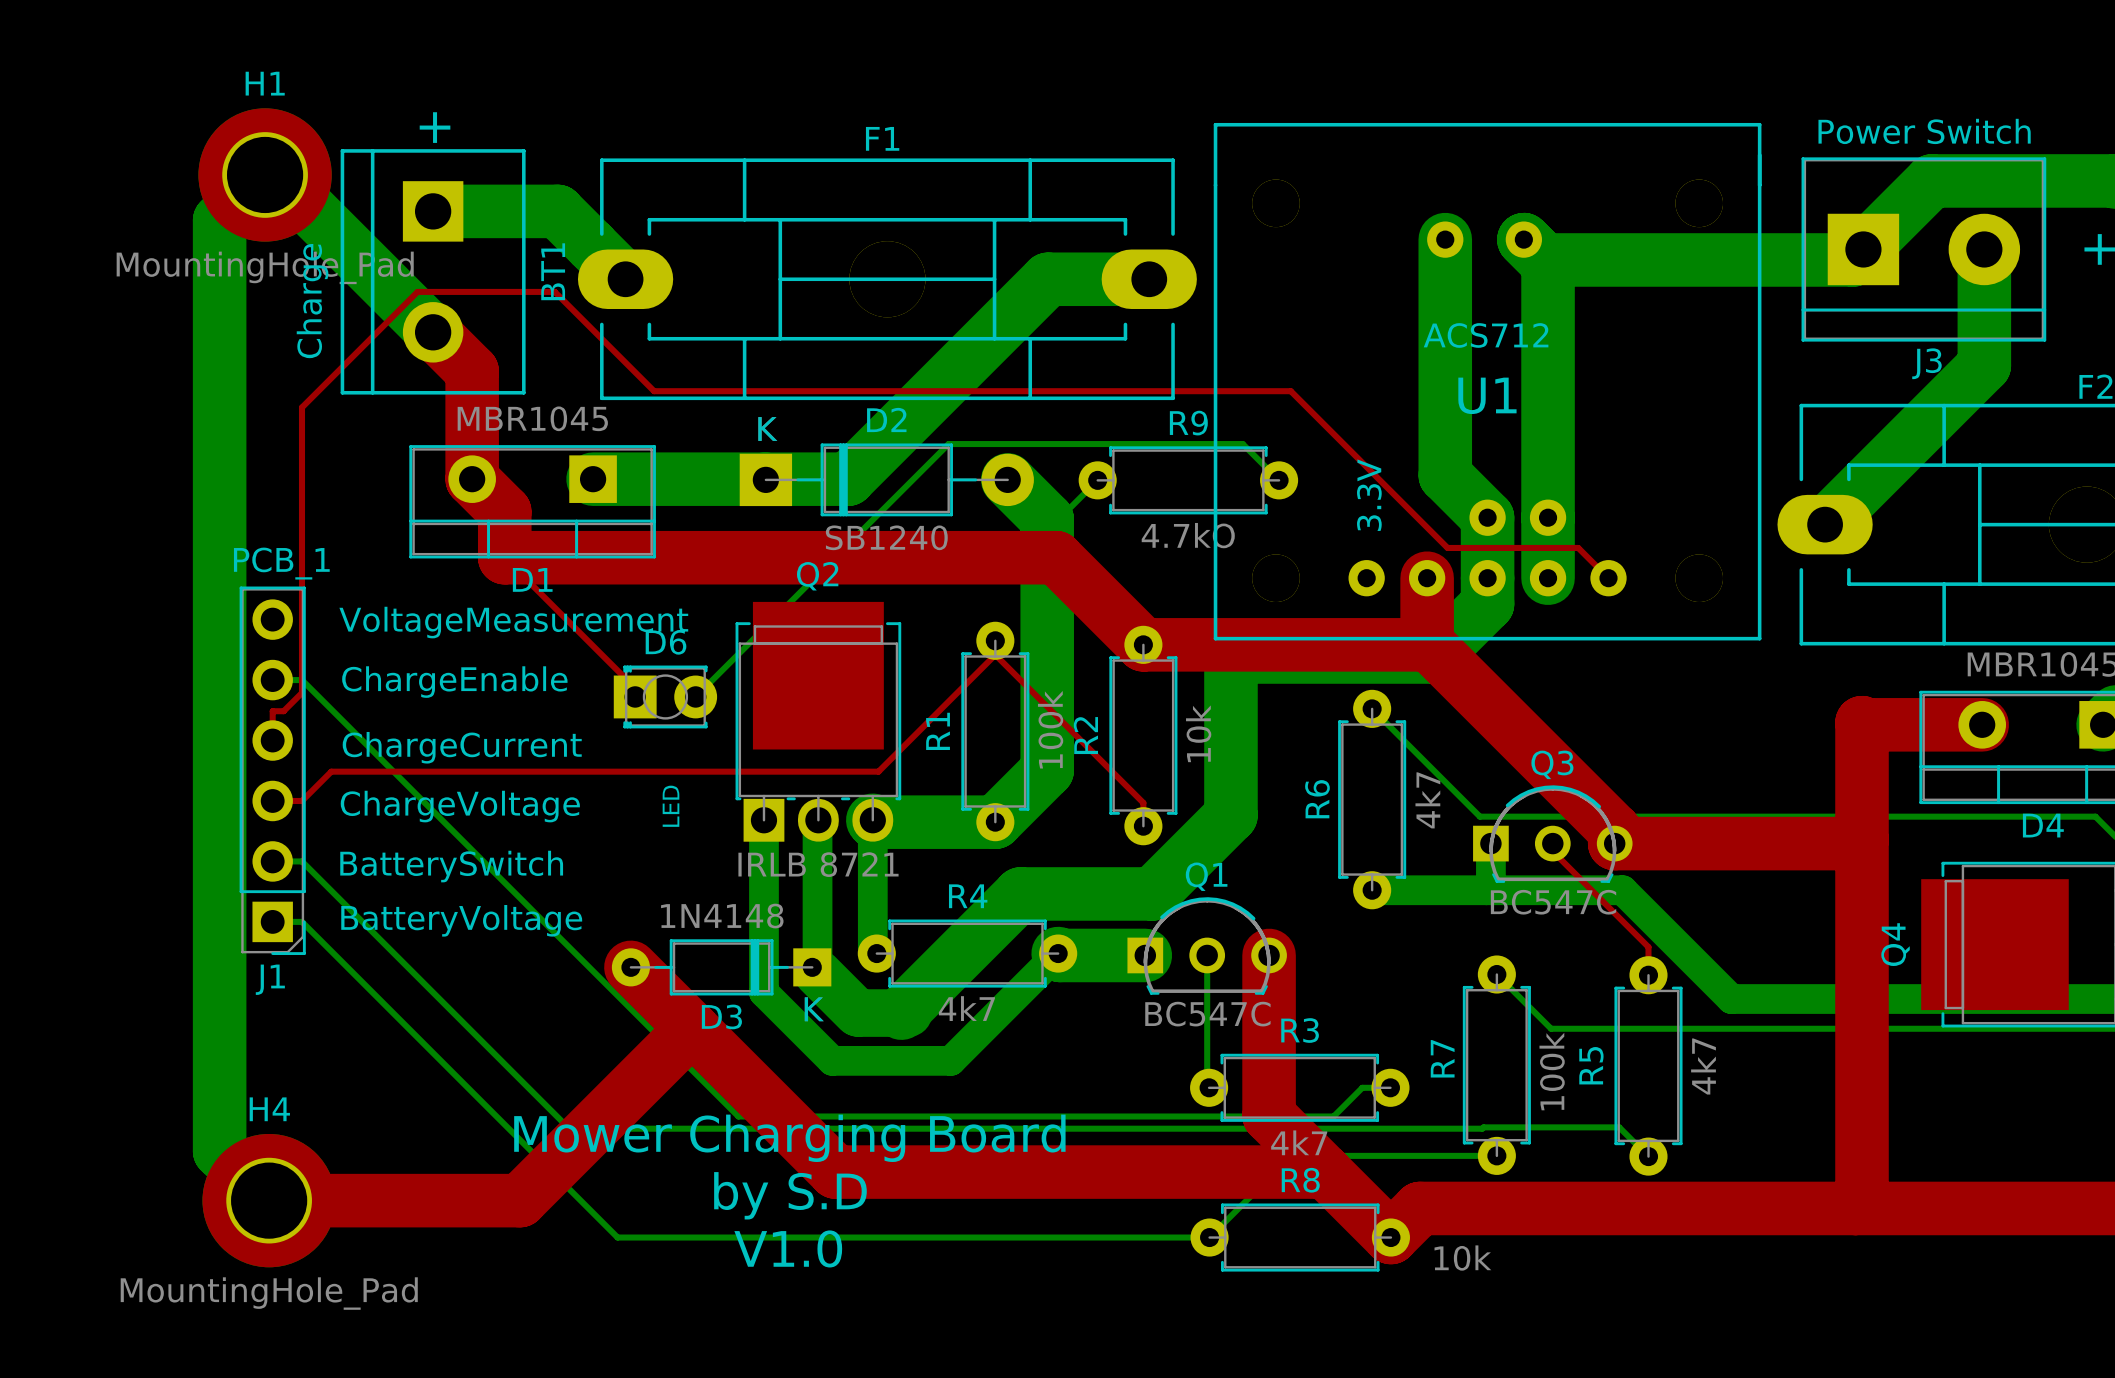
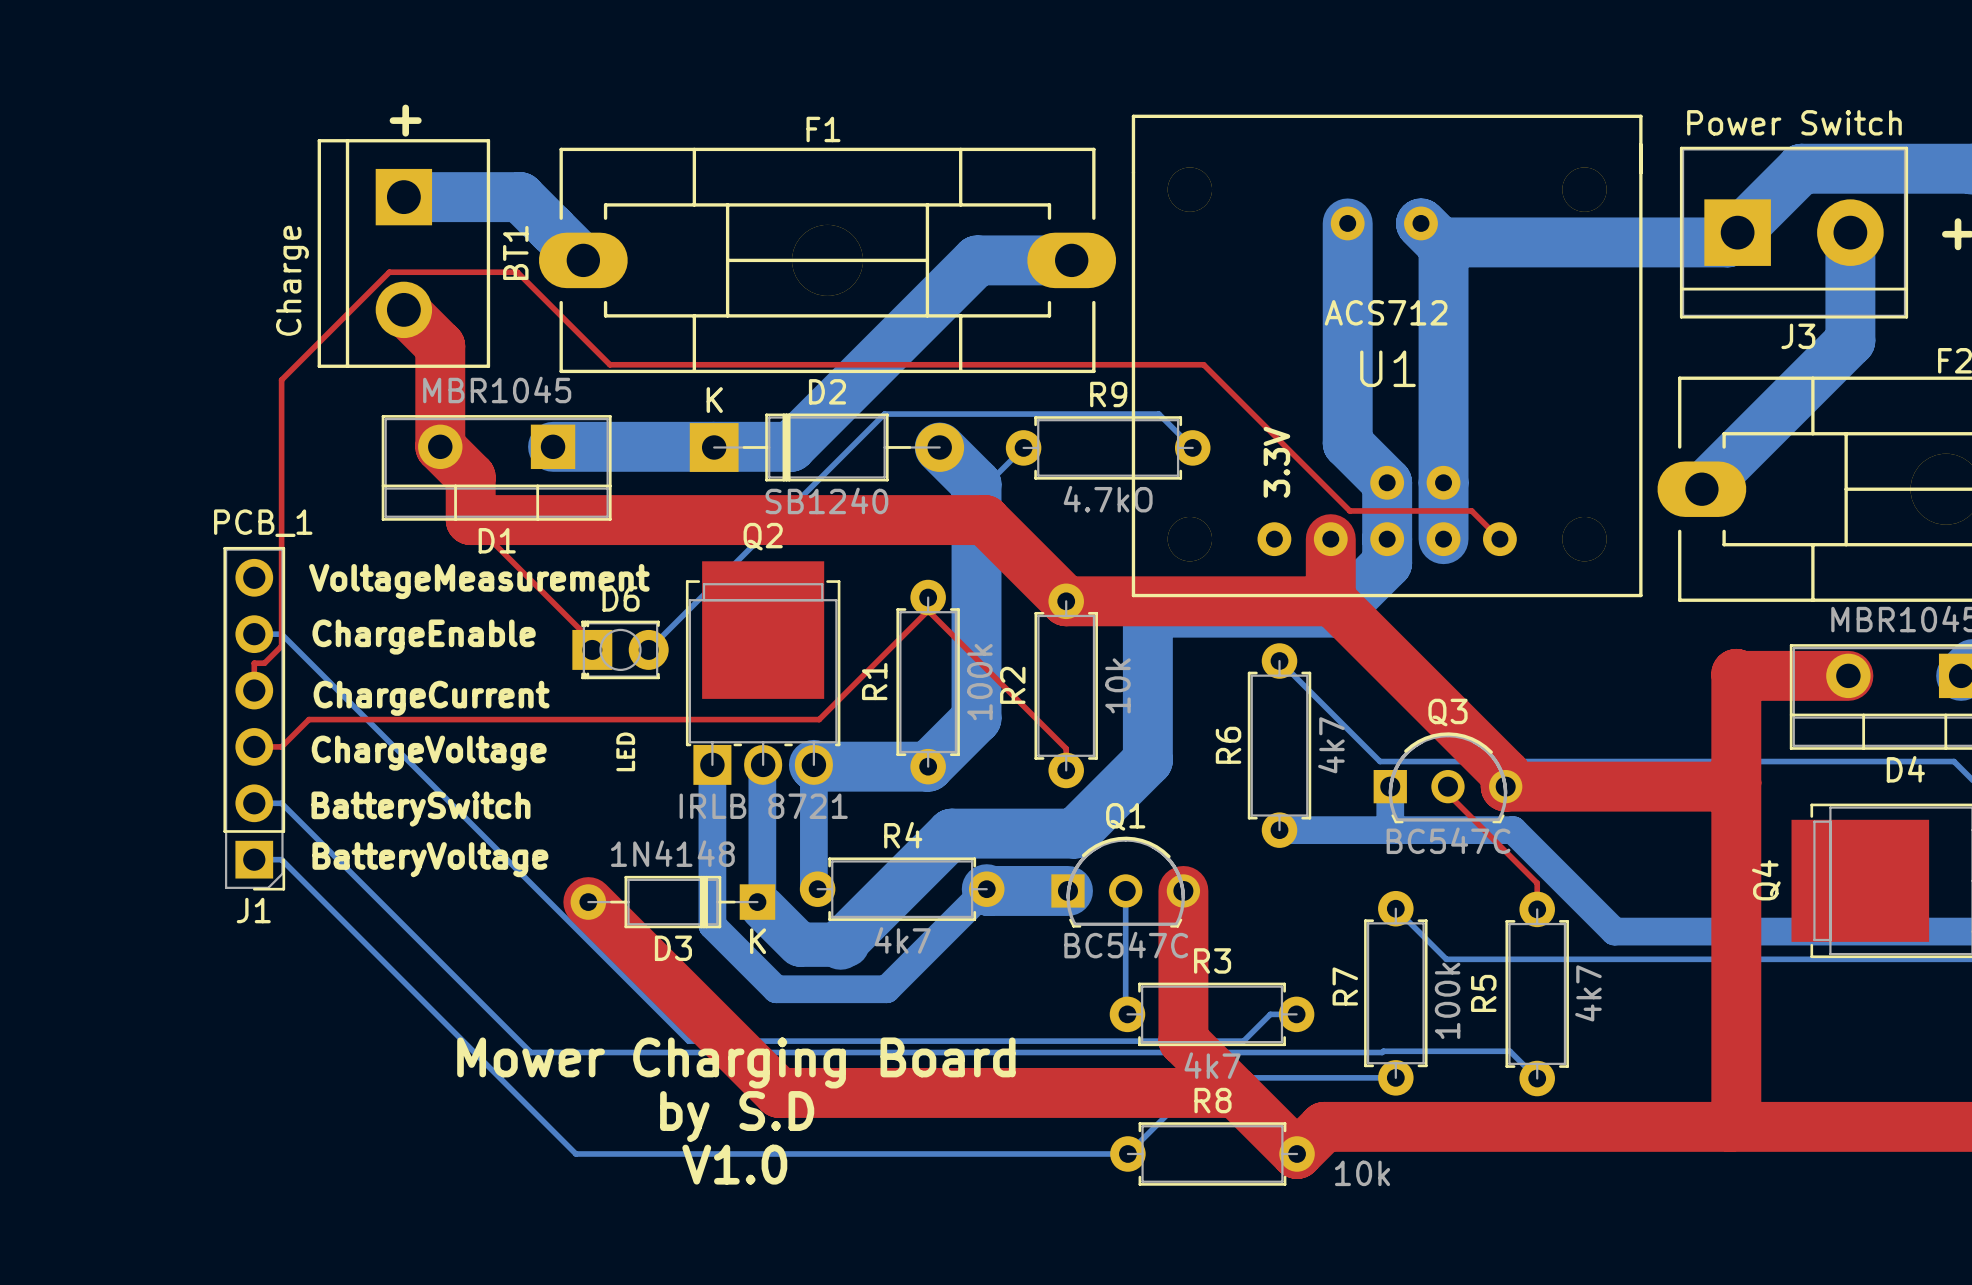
H1: MountingHole_Pad (265, 174) -> none
bottom track: (433, 332) (275, 174) (265, 174) (219, 220) (219, 1151) (269, 1200) -> none
top track: (692, 1028) (520, 1200) (269, 1200) -> none
H4: MountingHole_Pad (269, 1200) -> none

